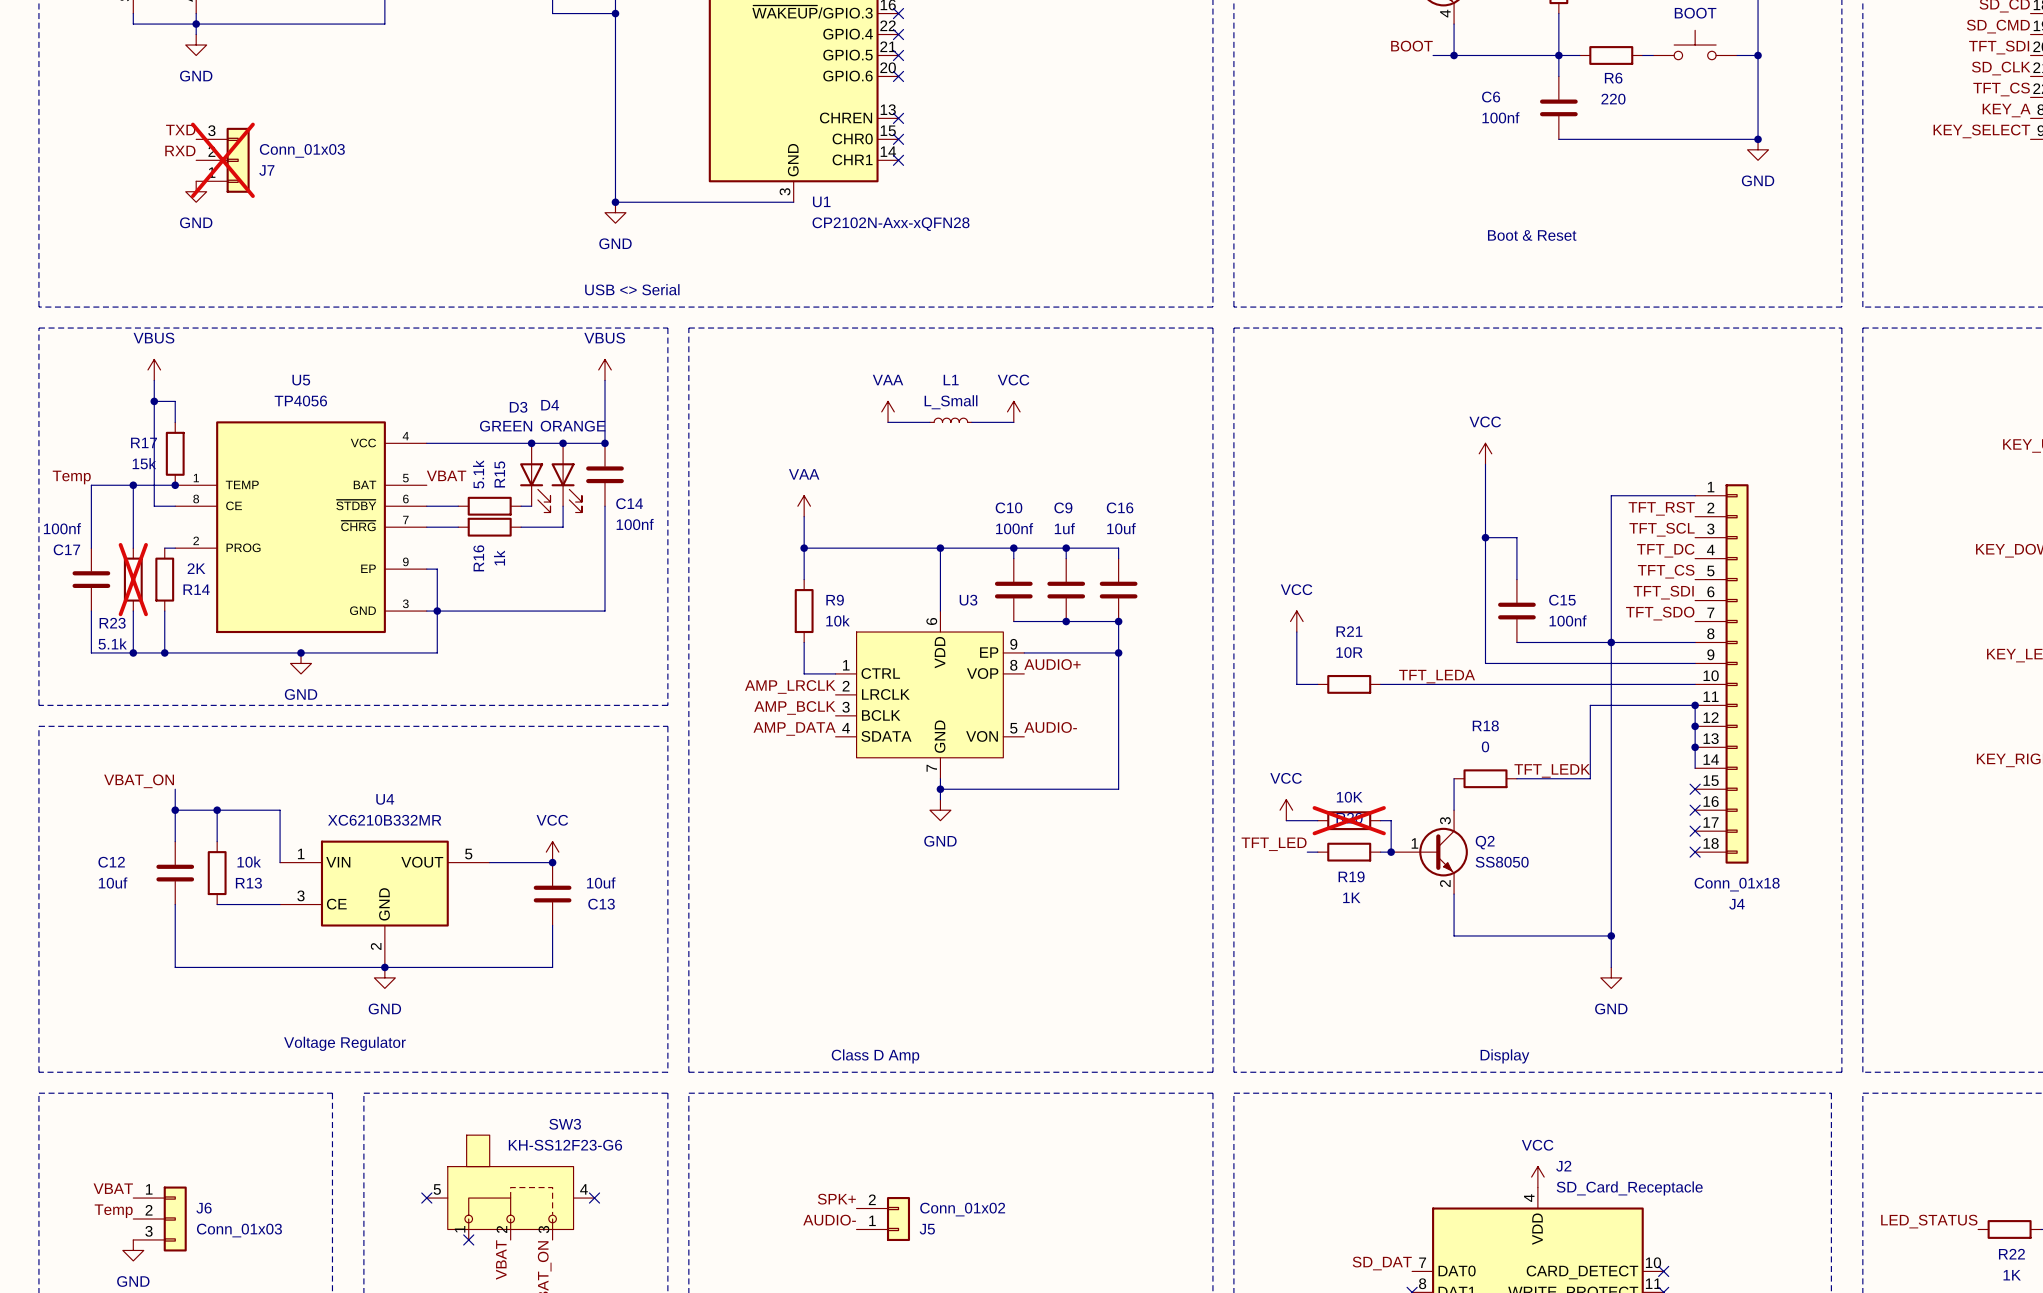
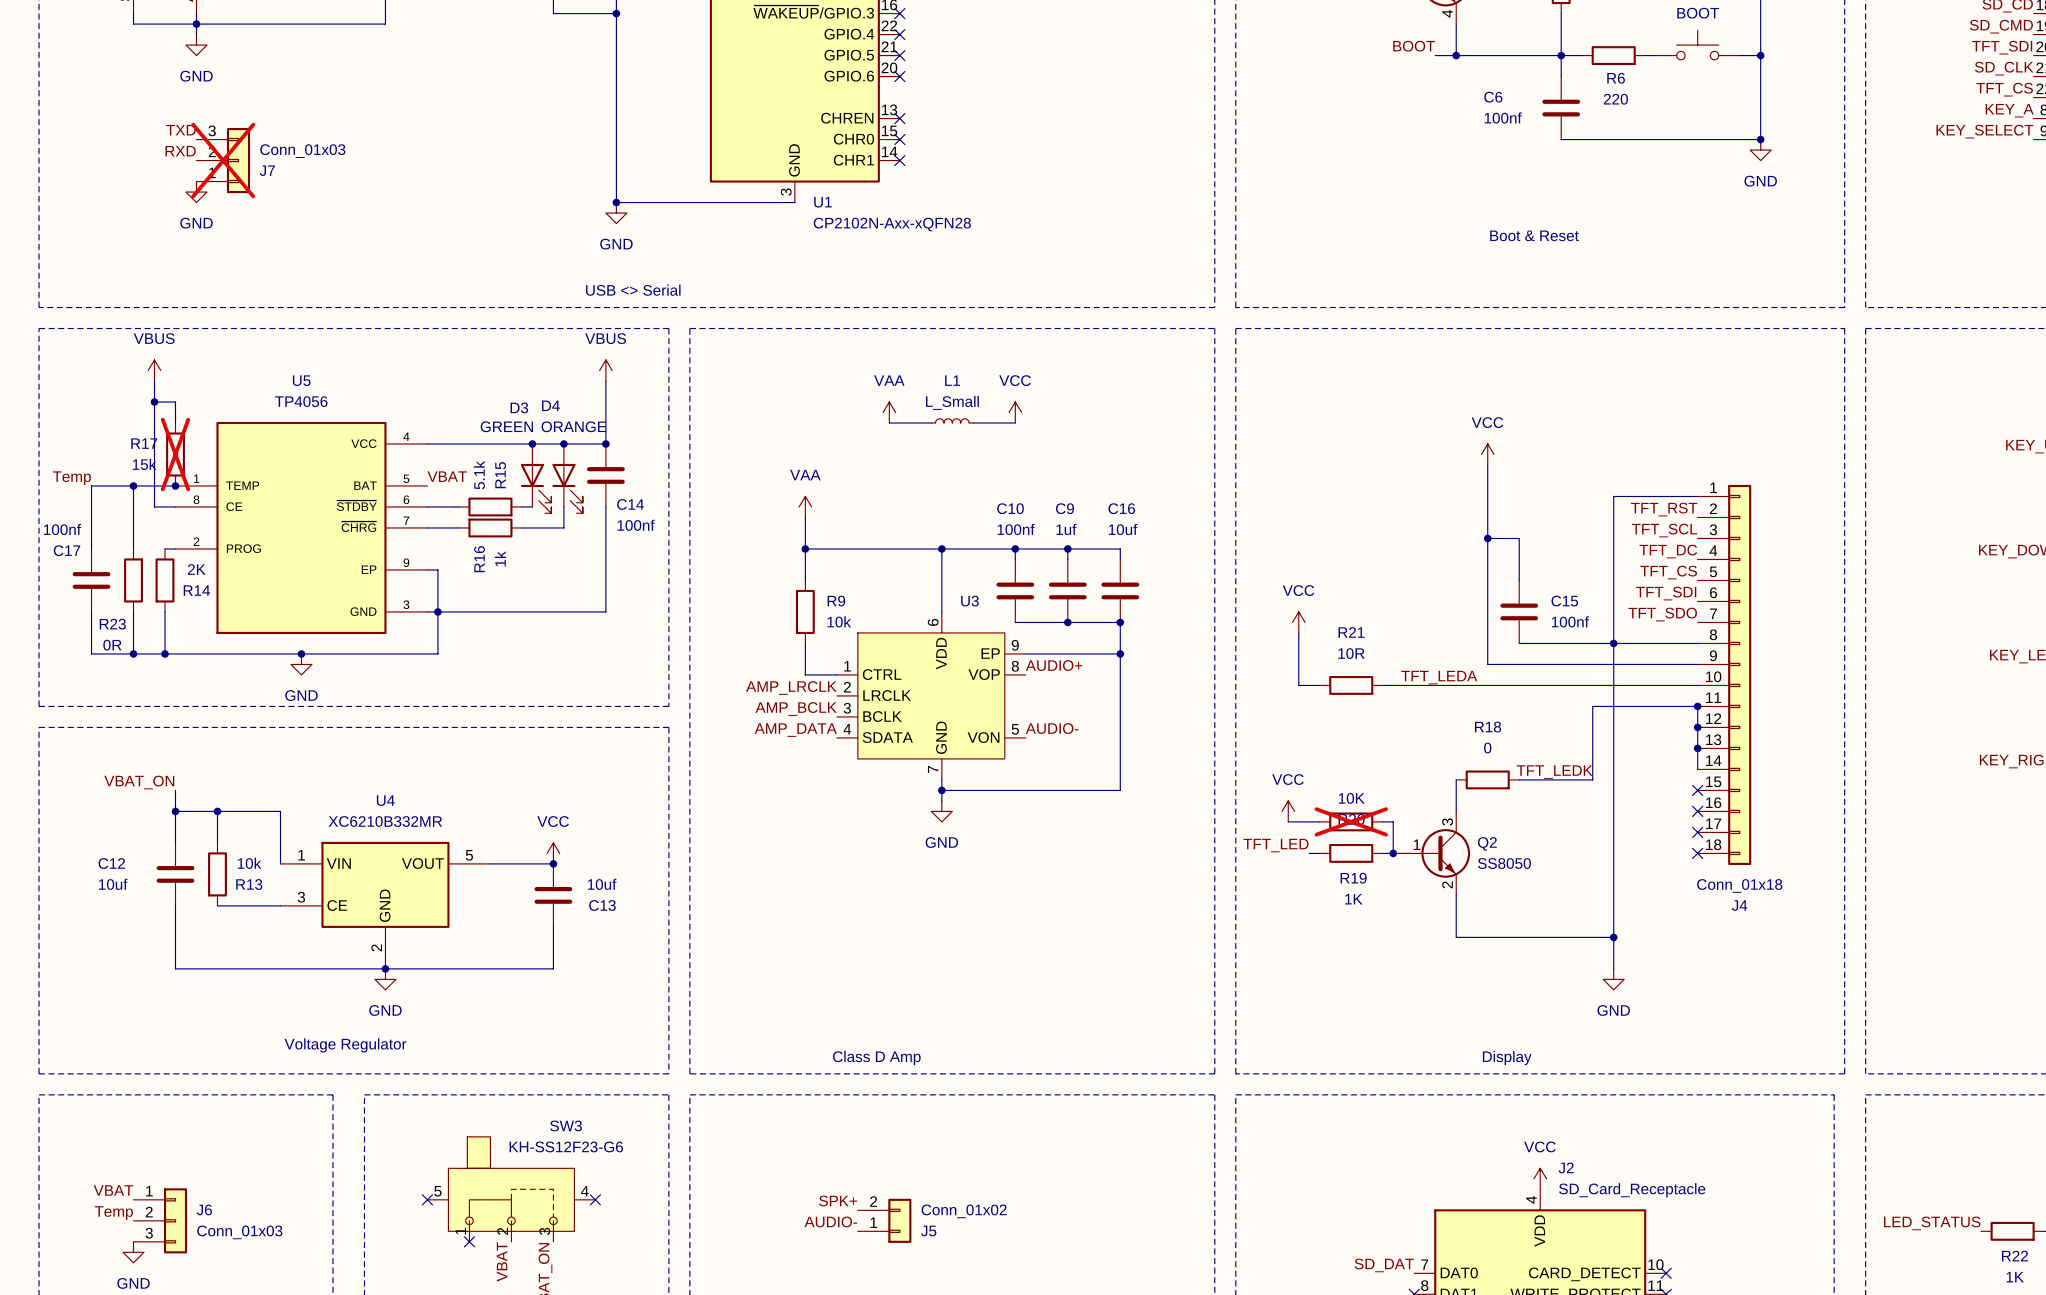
R17 do-not-place cross: none -> (175, 454)
R23 do-not-place cross: (133, 579) -> none
R23 value: 5.1k (112, 643) -> 0R (112, 645)

